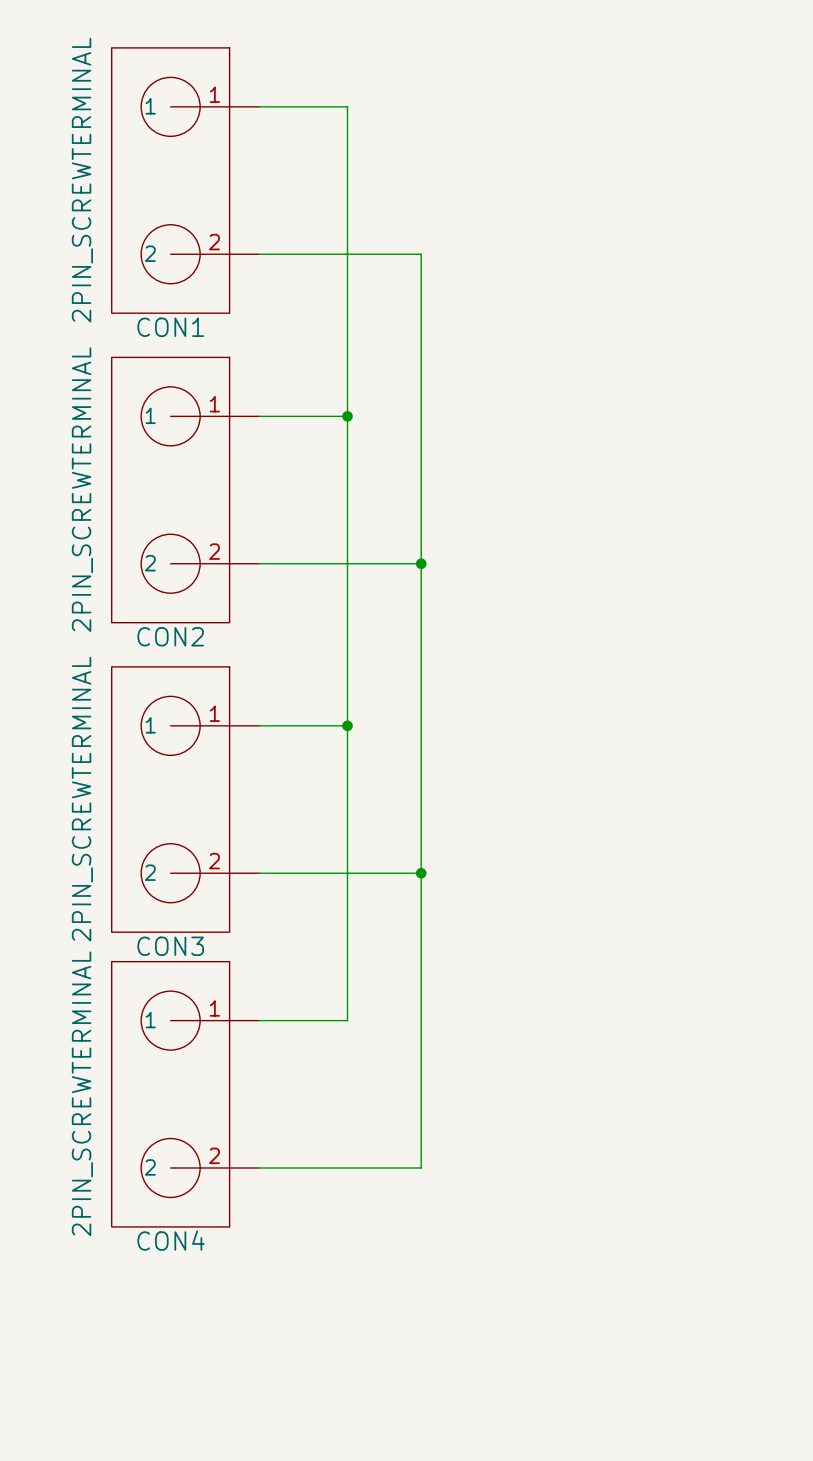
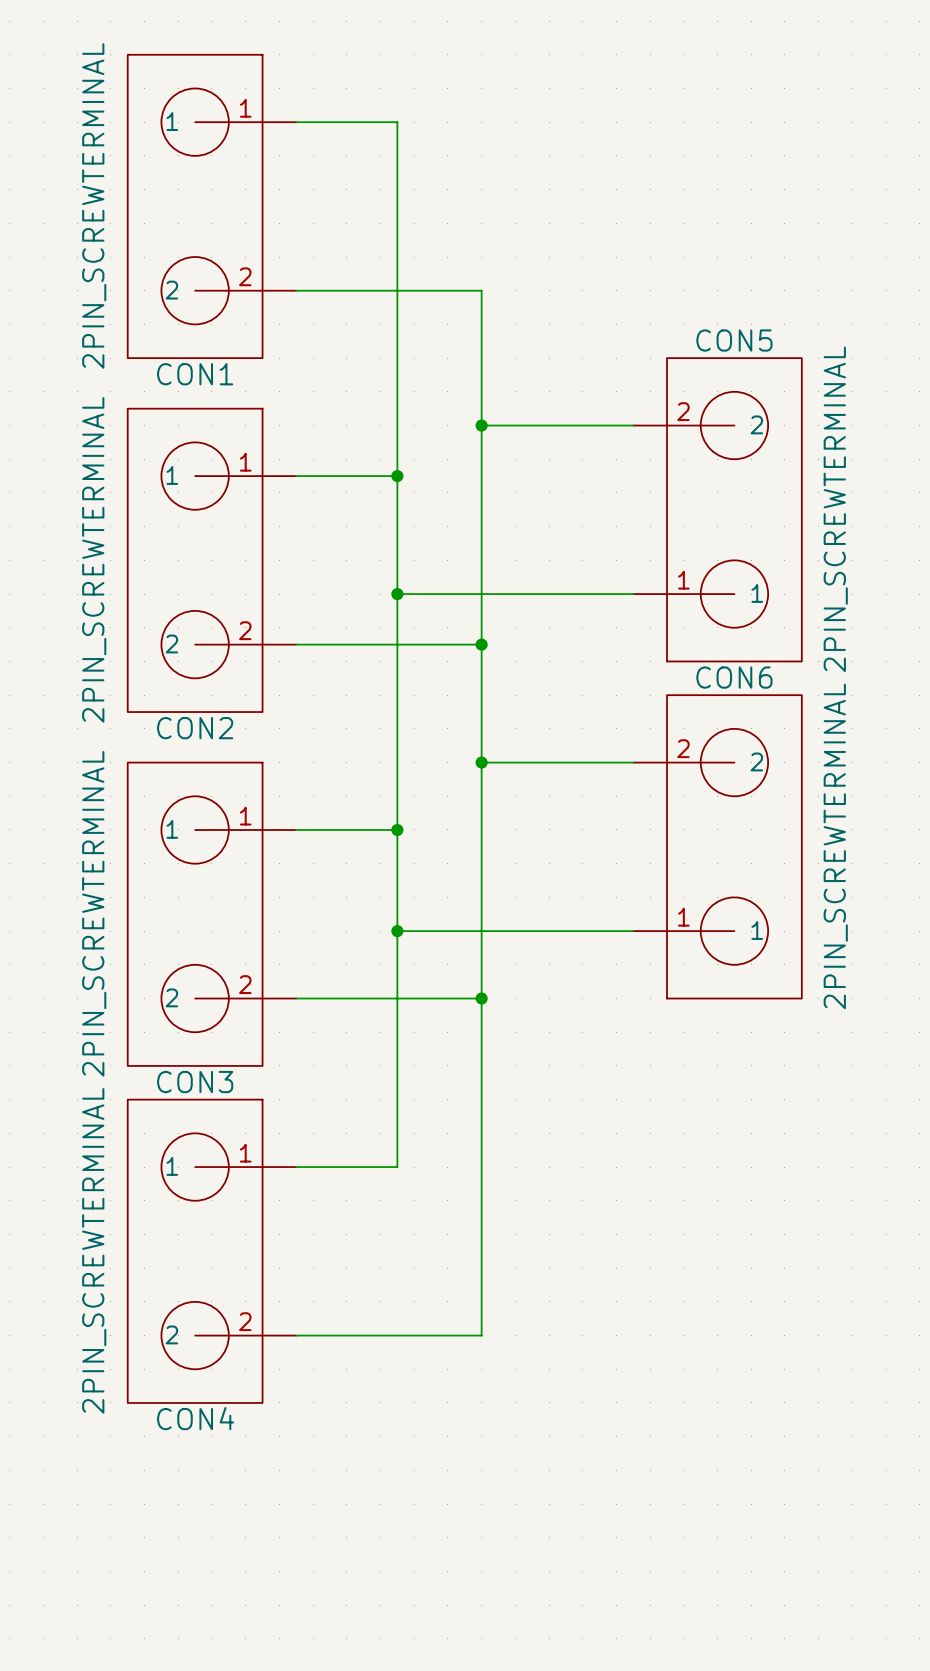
wire: none -> (481, 425) (633, 425)
junction: none -> (481, 425)
CON5: none -> 2PIN_SCREWTERMINAL (717, 509)
wire: none -> (397, 594) (633, 594)
junction: none -> (397, 594)
wire: none -> (481, 762) (633, 762)
junction: none -> (481, 762)
CON6: none -> 2PIN_SCREWTERMINAL (717, 846)
wire: none -> (397, 931) (633, 931)
junction: none -> (397, 931)

